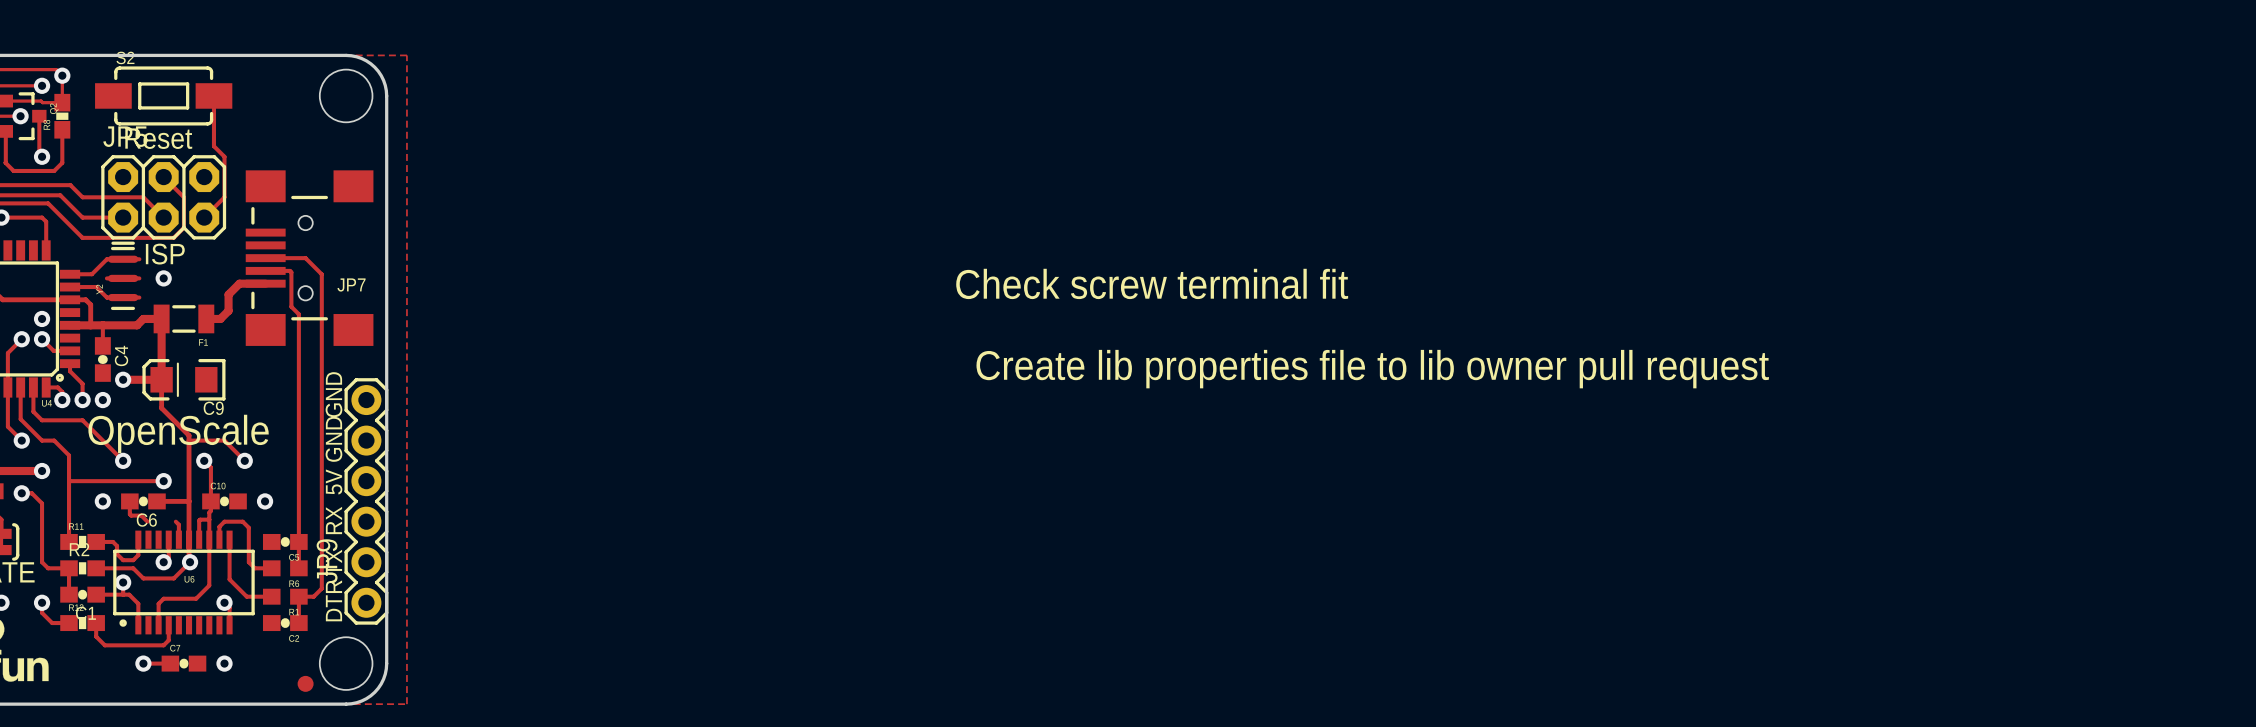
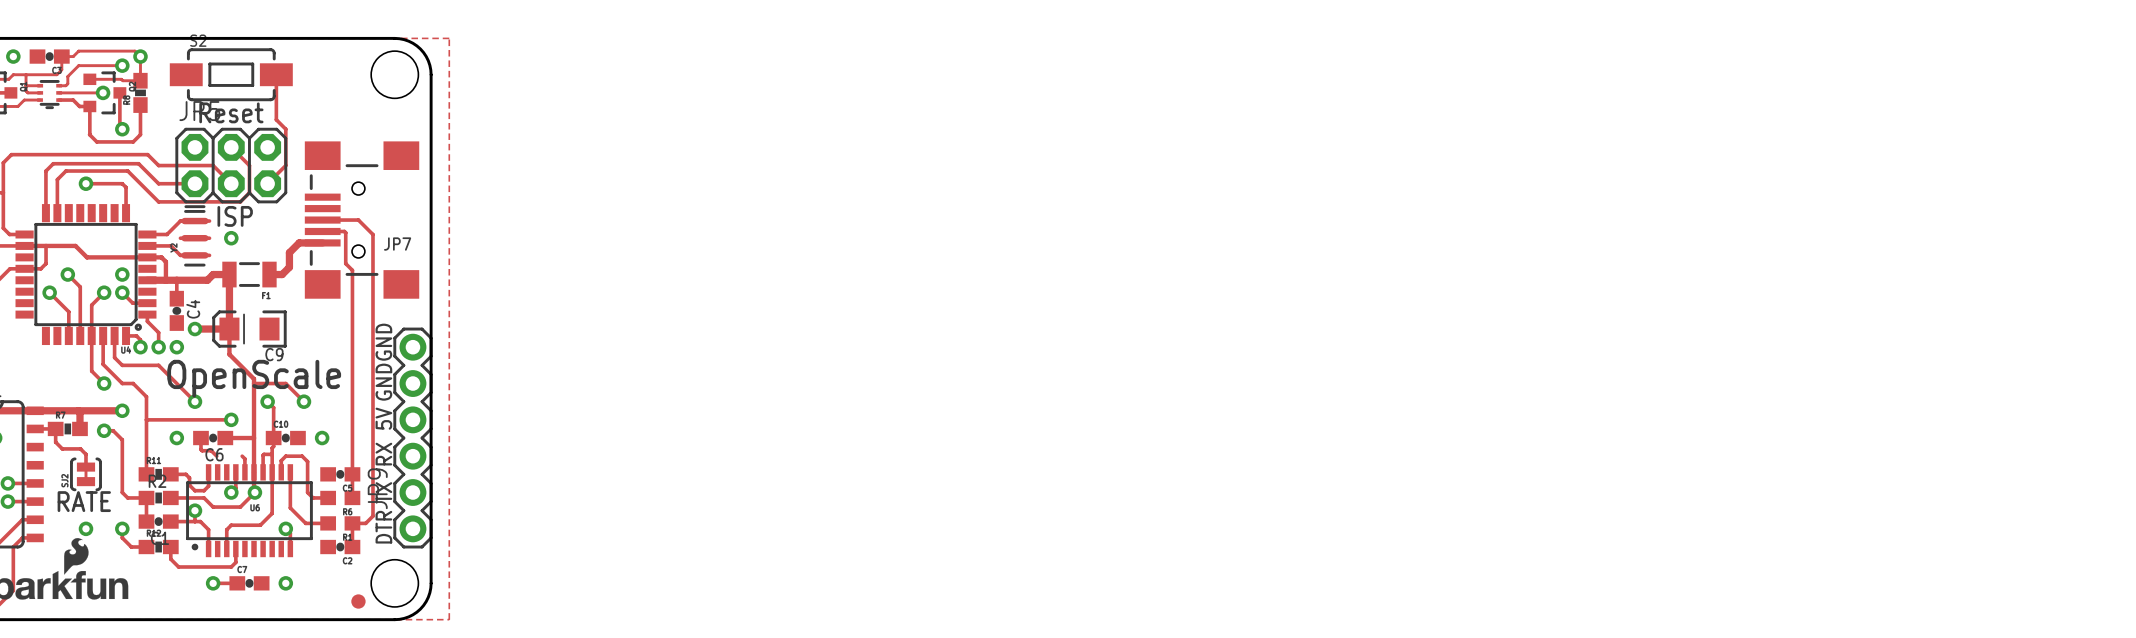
text: Check screw terminal fit (1152, 283) -> none
text: Create lib properties file to lib owner pull request (1372, 369) -> none

